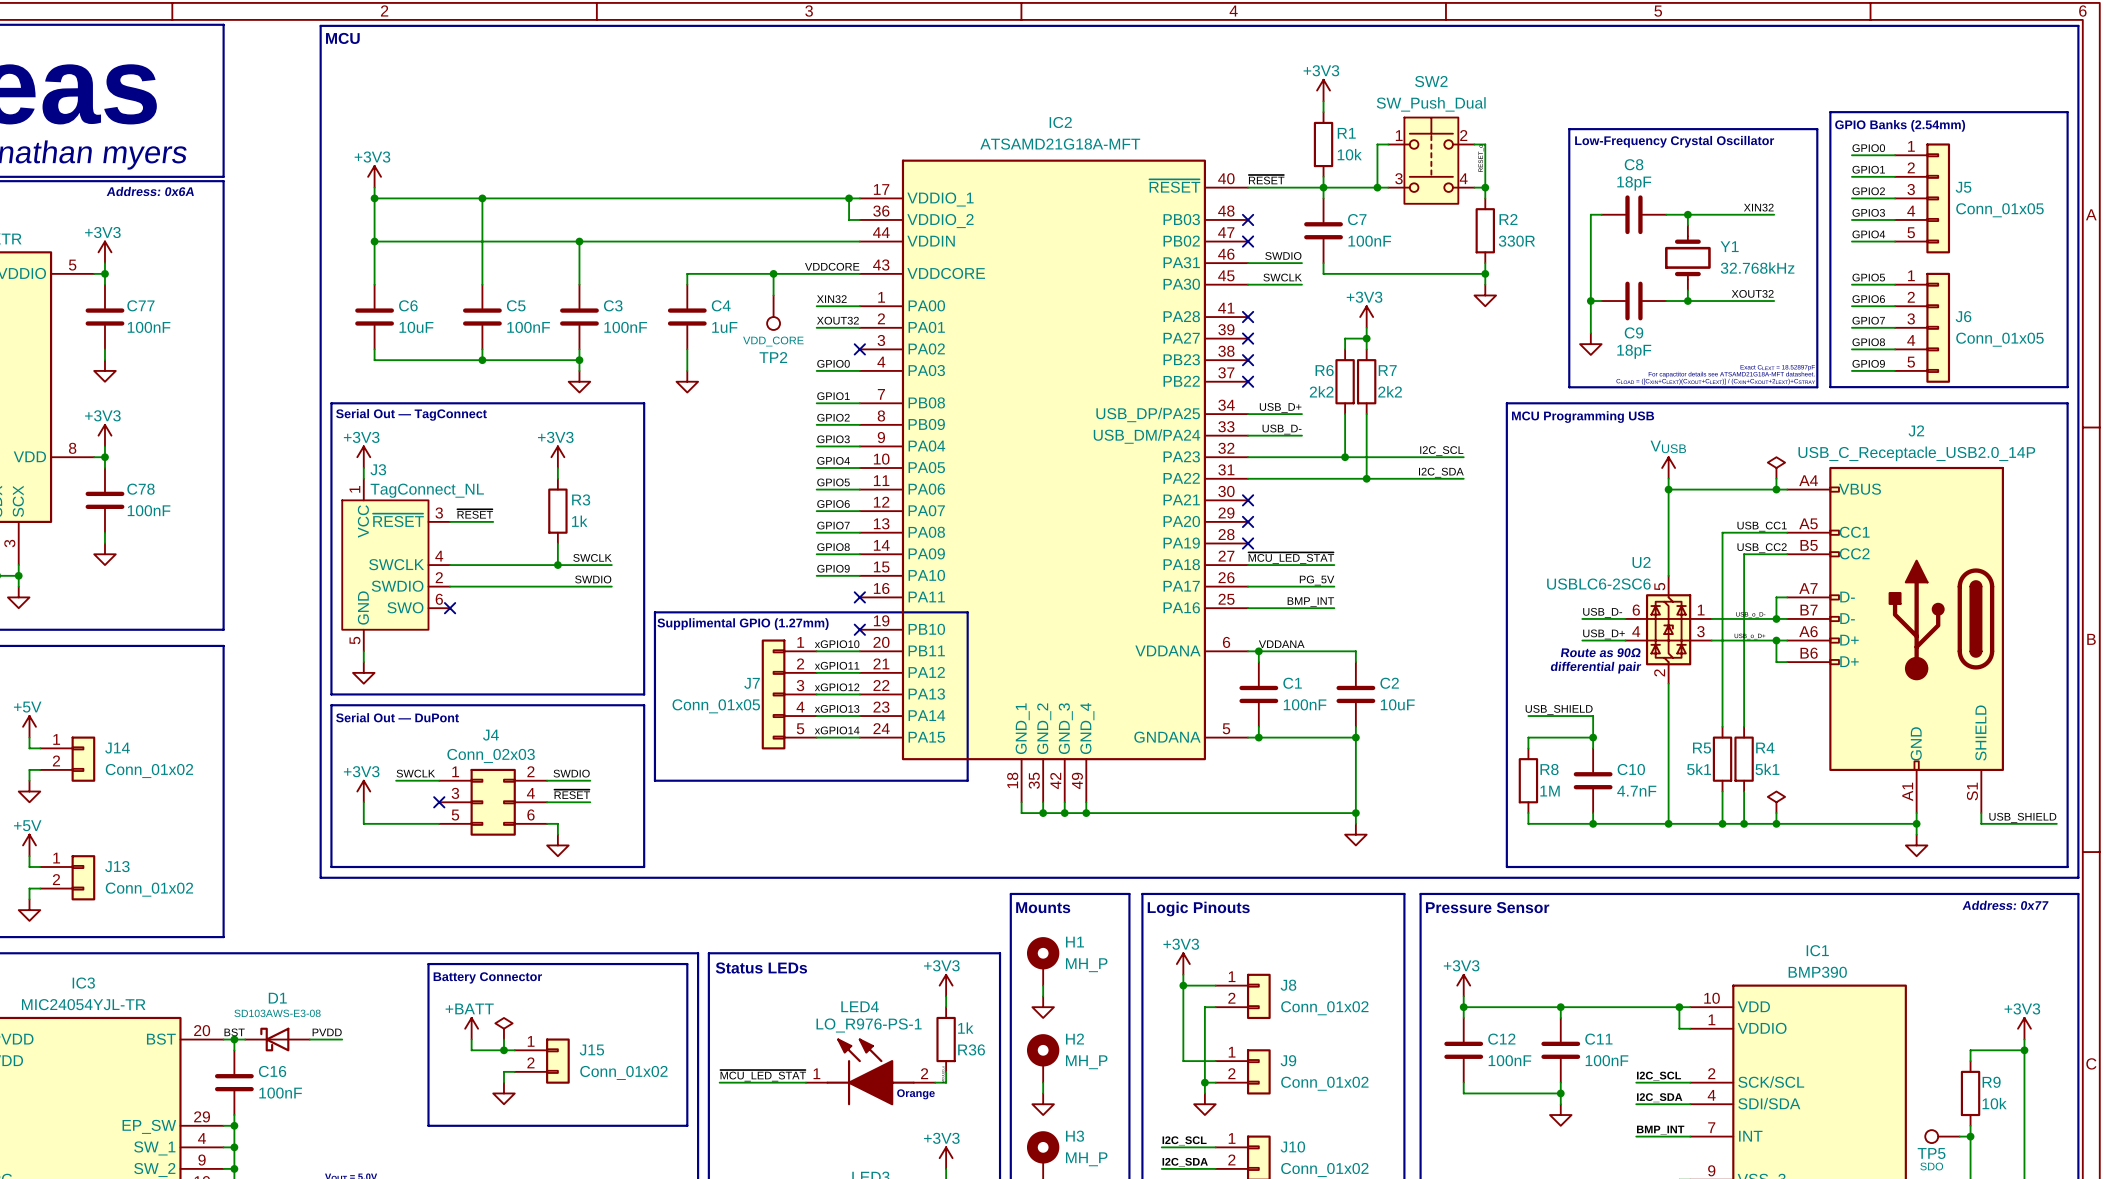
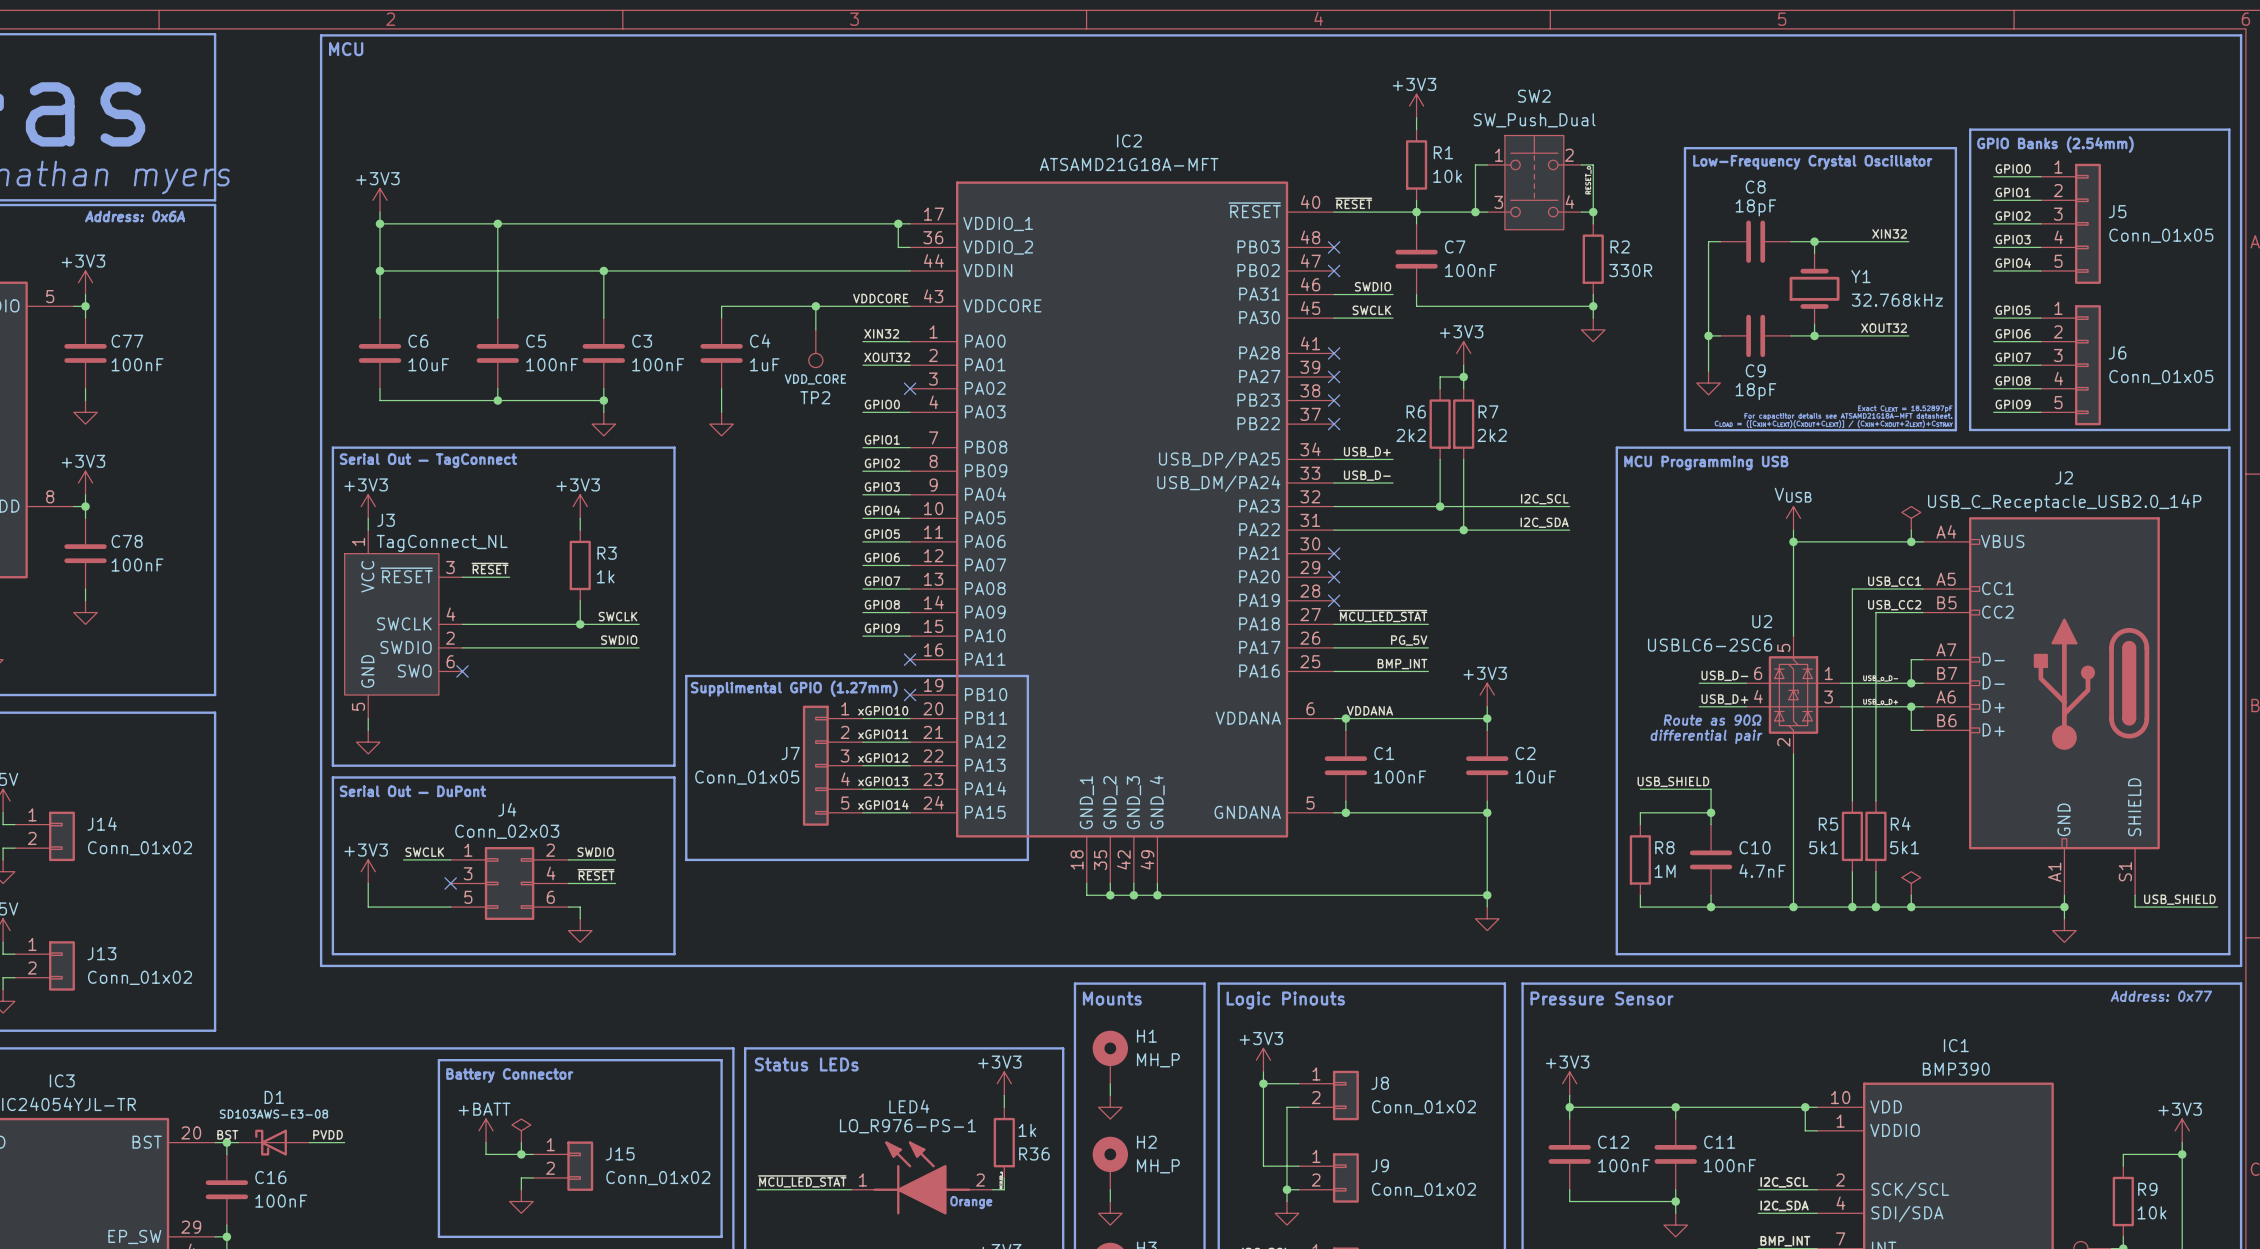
power symbol: none -> +3V3 (1487, 695)
wire: none -> (1487, 706) (1487, 730)
wire: (1355, 651) (1355, 662) -> (1451, 718) (1487, 718)
junction: none -> (1487, 718)
C2 position: (1355, 694) -> (1487, 765)
wire: (1355, 726) (1355, 823) -> (1487, 801) (1487, 907)
wire: none -> (1451, 812) (1487, 812)
junction position: (1355, 737) -> (1487, 812)
wire: none -> (1451, 895) (1487, 895)
junction position: (1355, 813) -> (1487, 895)
power symbol position: (1355, 834) -> (1487, 918)

